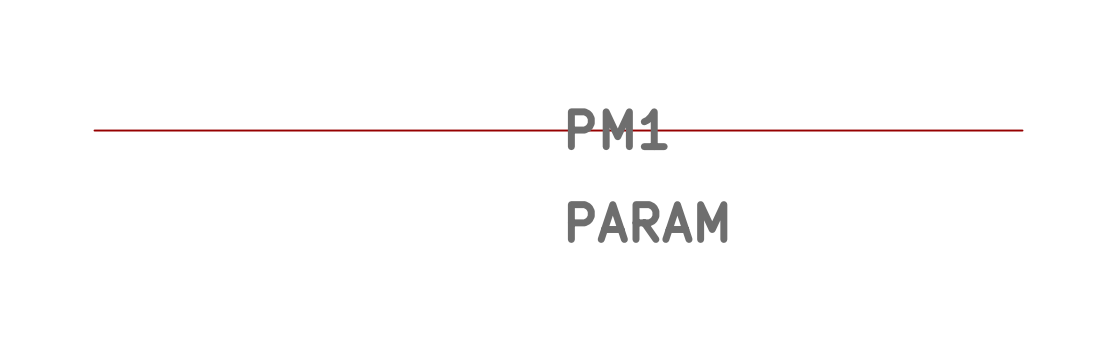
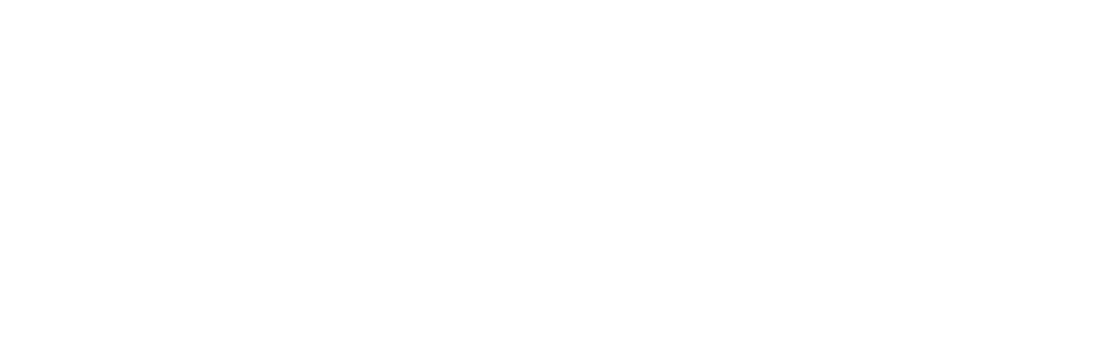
PM1: PARAM (558, 130) -> none

